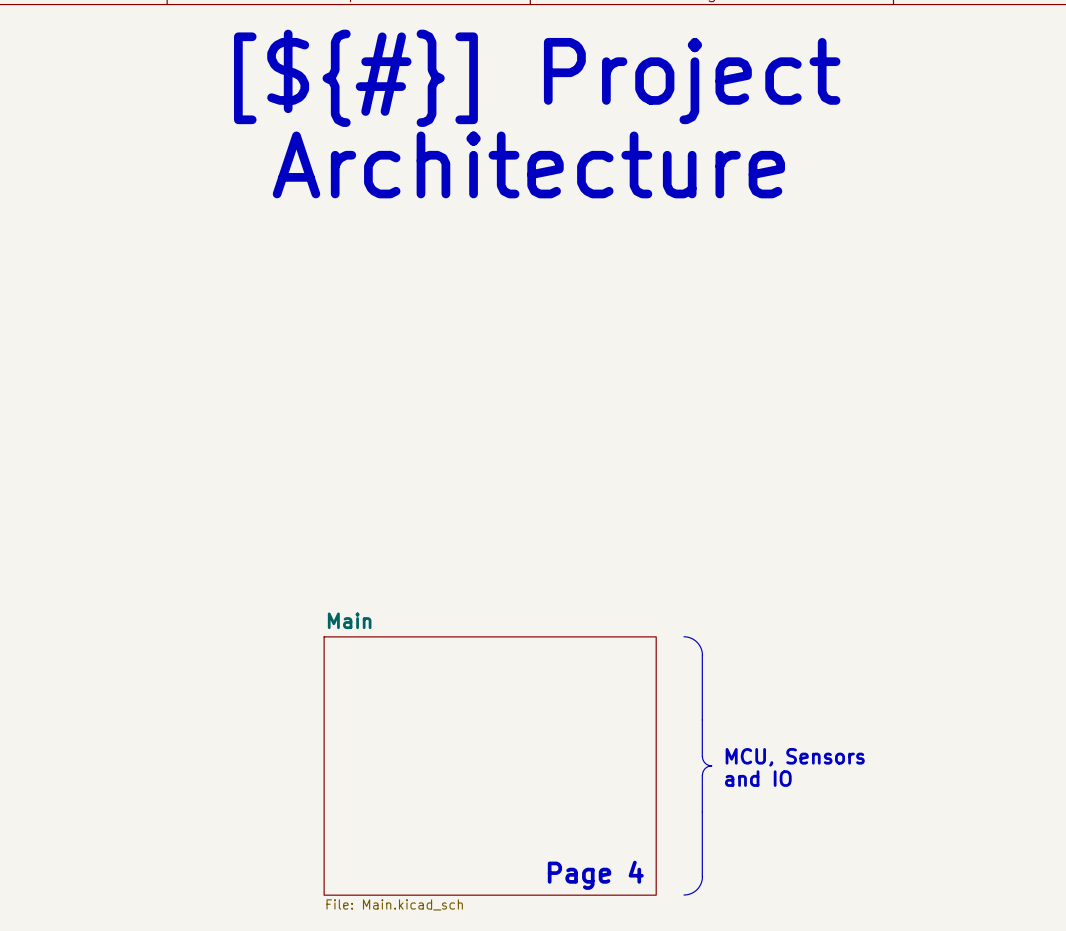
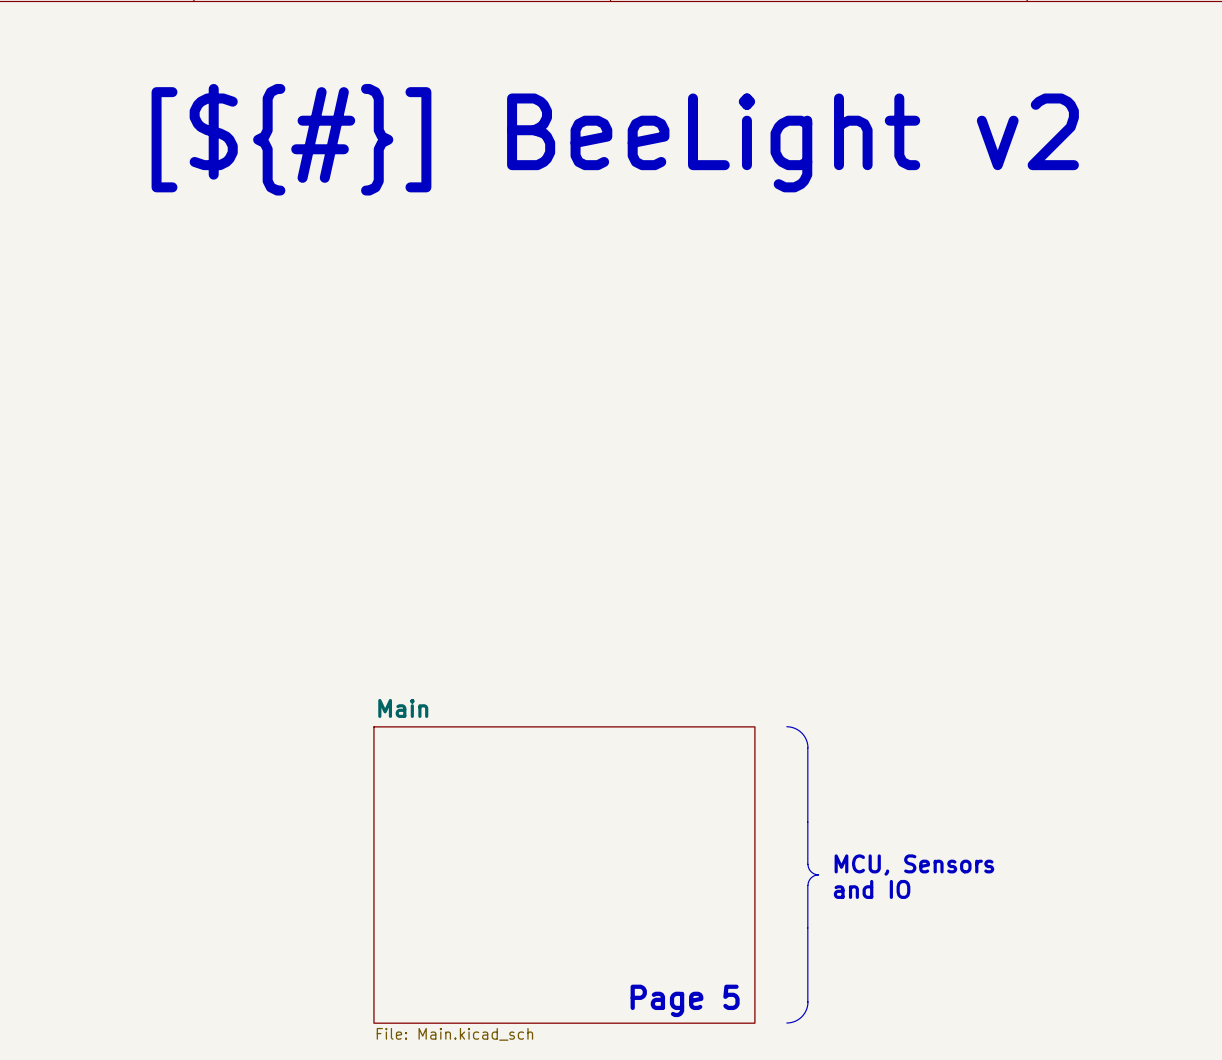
text: [${#}] Project (537, 78) -> none
text: none -> [${#}] BeeLight v2 (615, 139)
text: Architecture (528, 164) -> none
text: Page 4 (595, 875) -> Page 5 (685, 1000)

